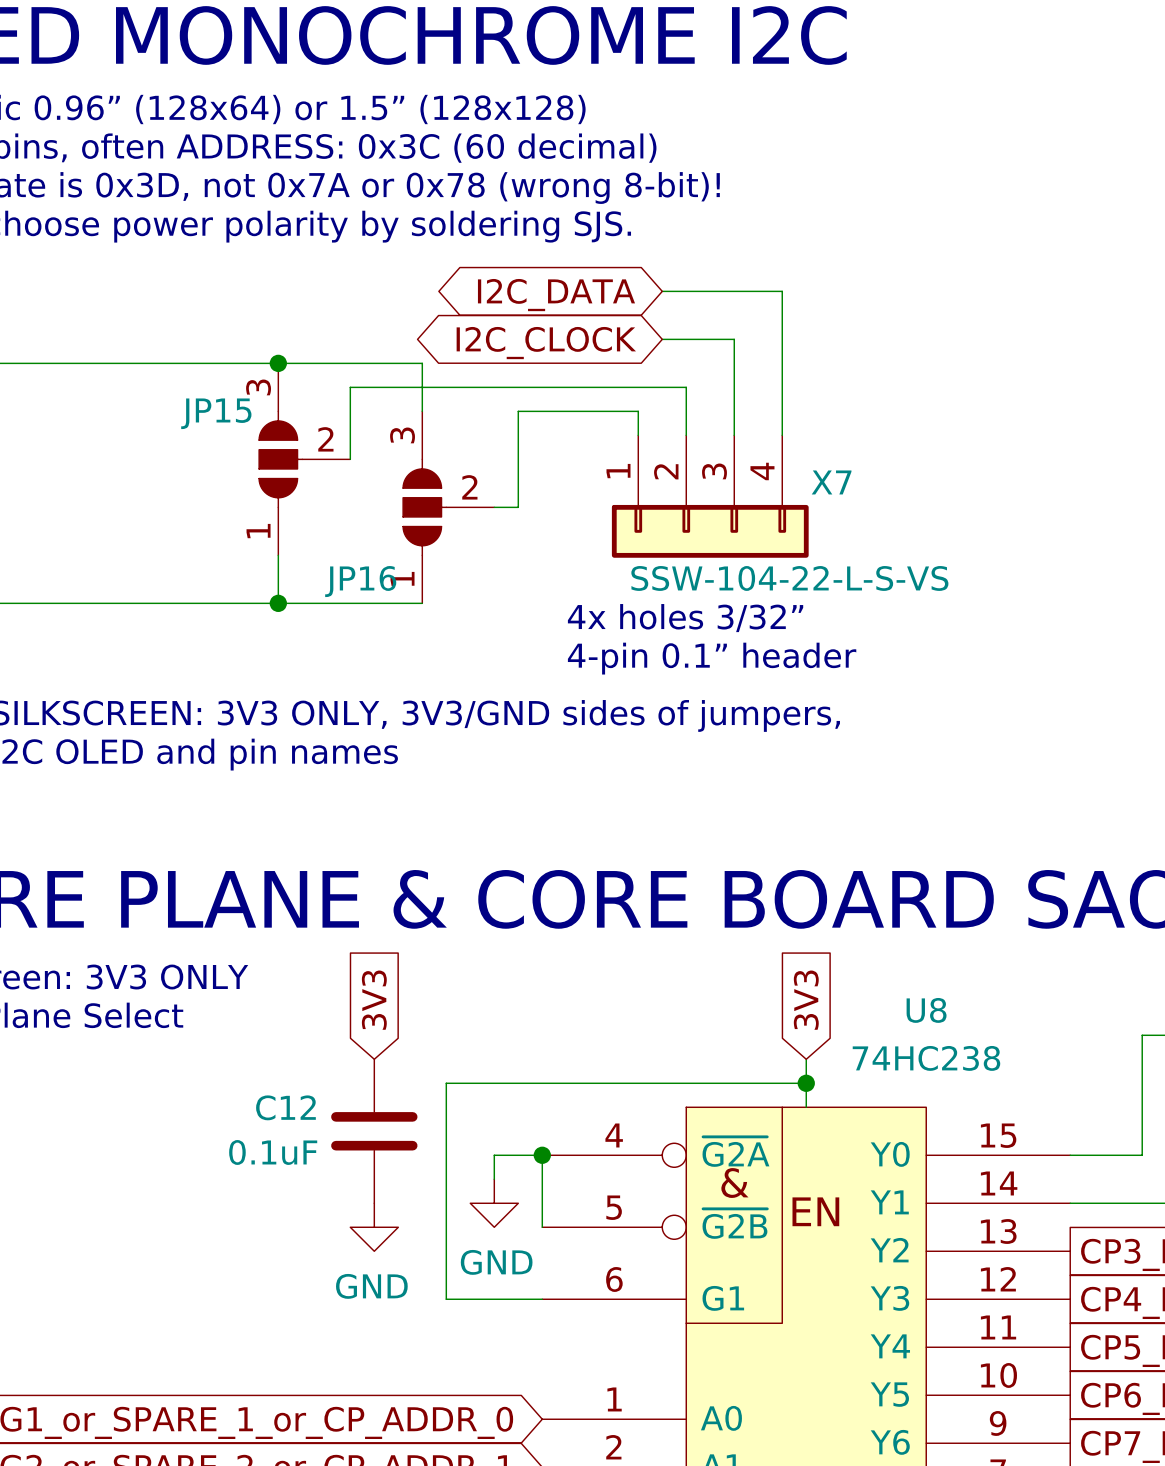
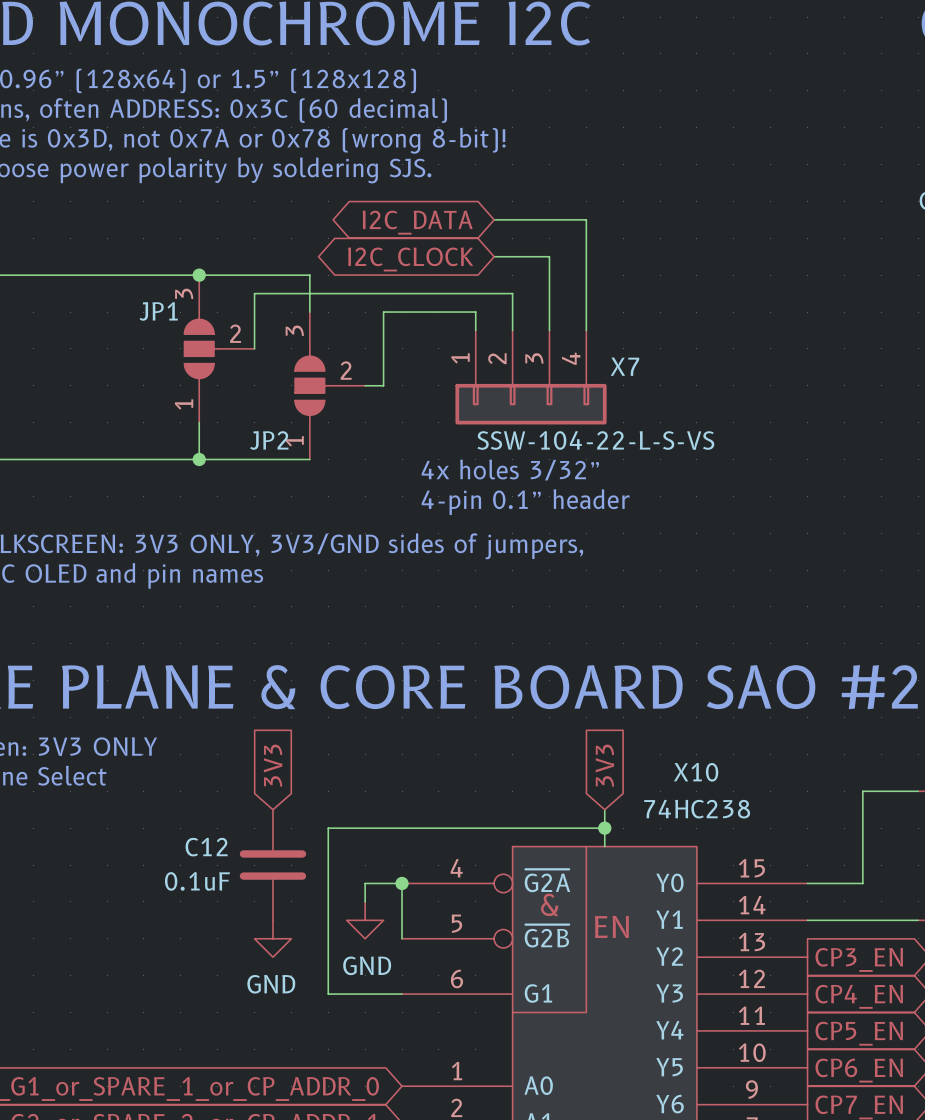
JP15 name: JP15 (216, 413) -> JP1 (158, 311)
JP16 name: JP16 (360, 581) -> JP2 (269, 440)
U8 name: U8 (926, 1010) -> X10 (696, 772)

